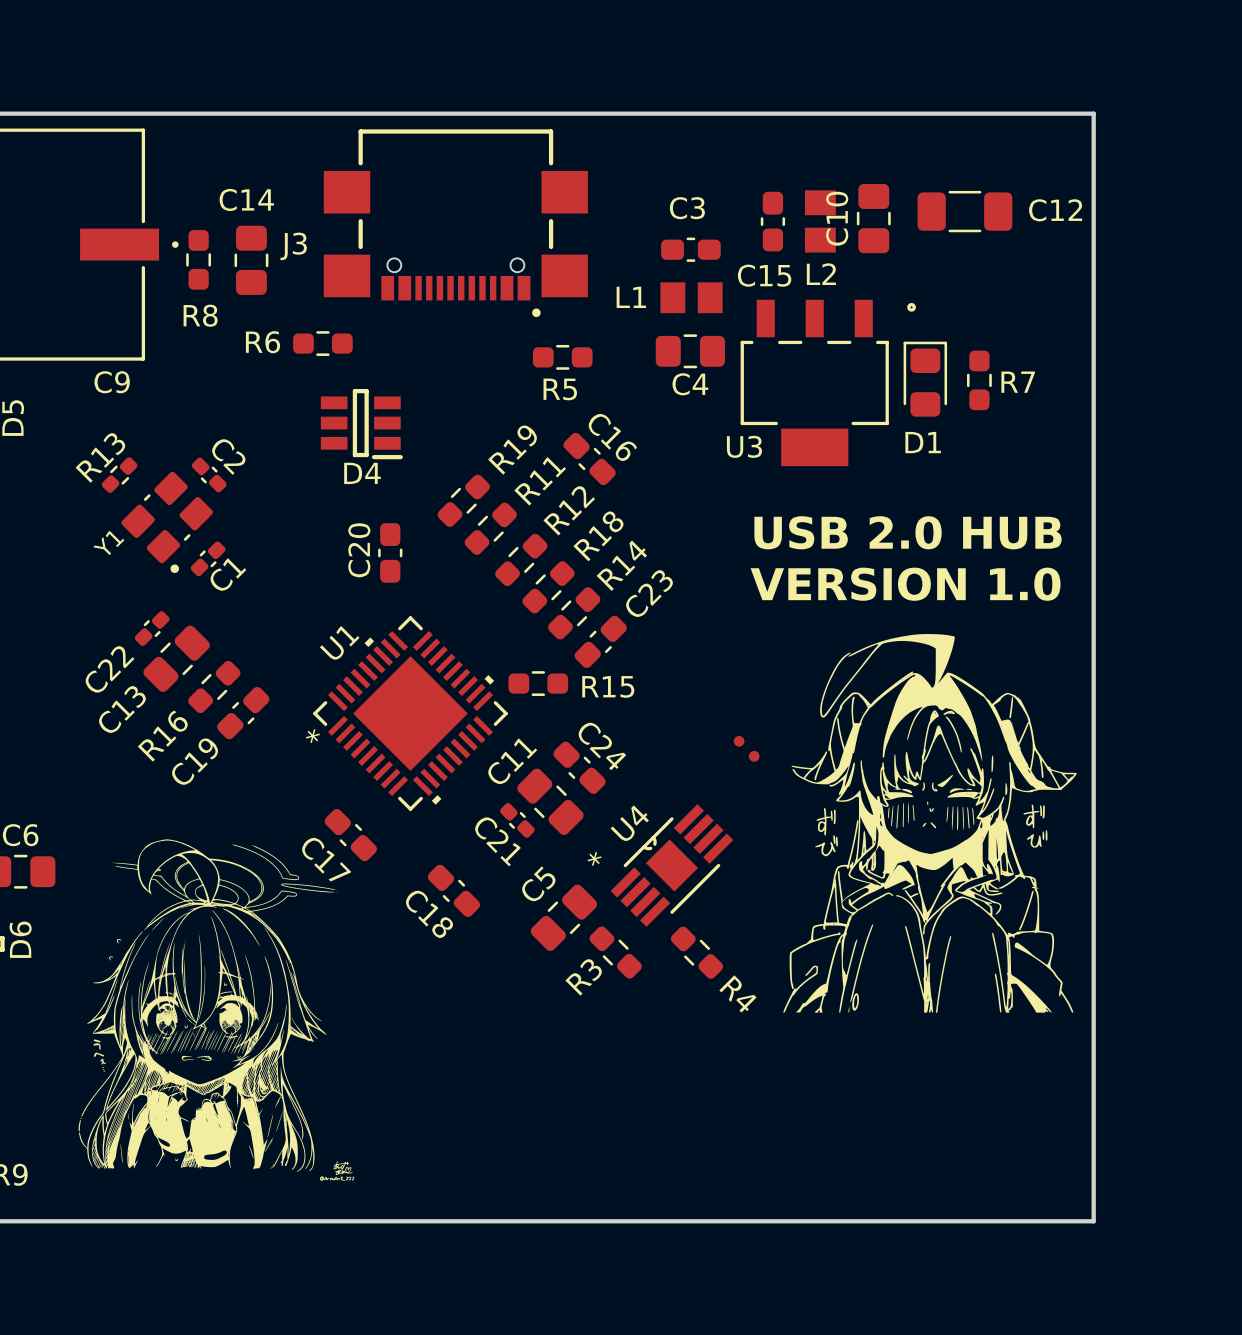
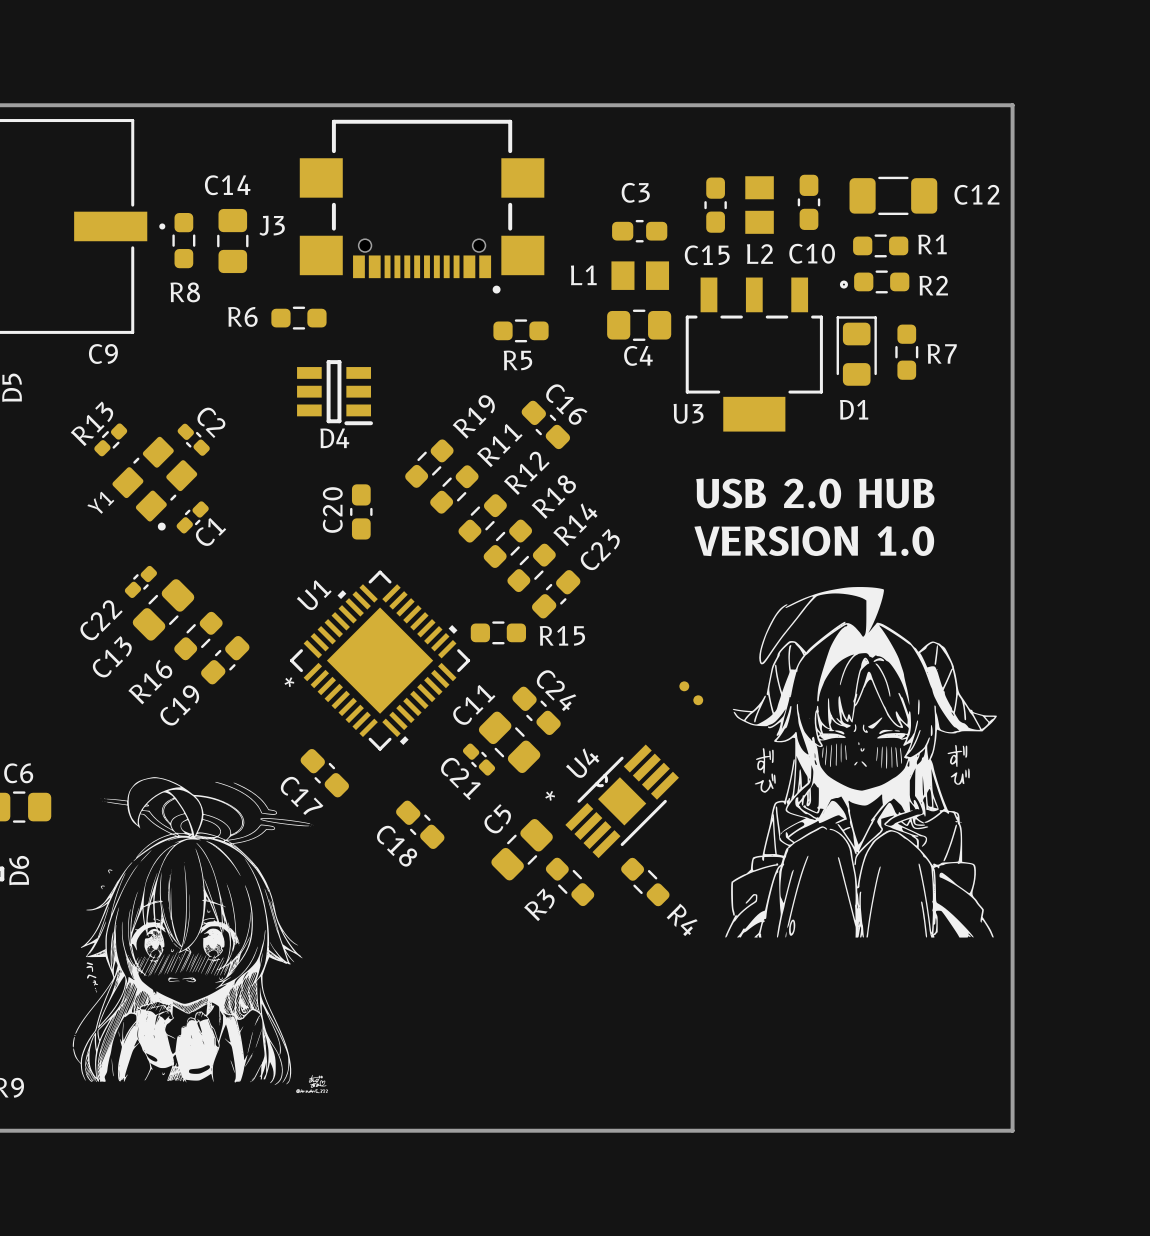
C10 footprint: [856, 183, 891, 254] -> [797, 174, 821, 230]
C10 name rotation: 0° (837, 218) -> 90° clockwise (812, 253)
R1: none -> (880, 245)
R2: none -> (881, 281)

